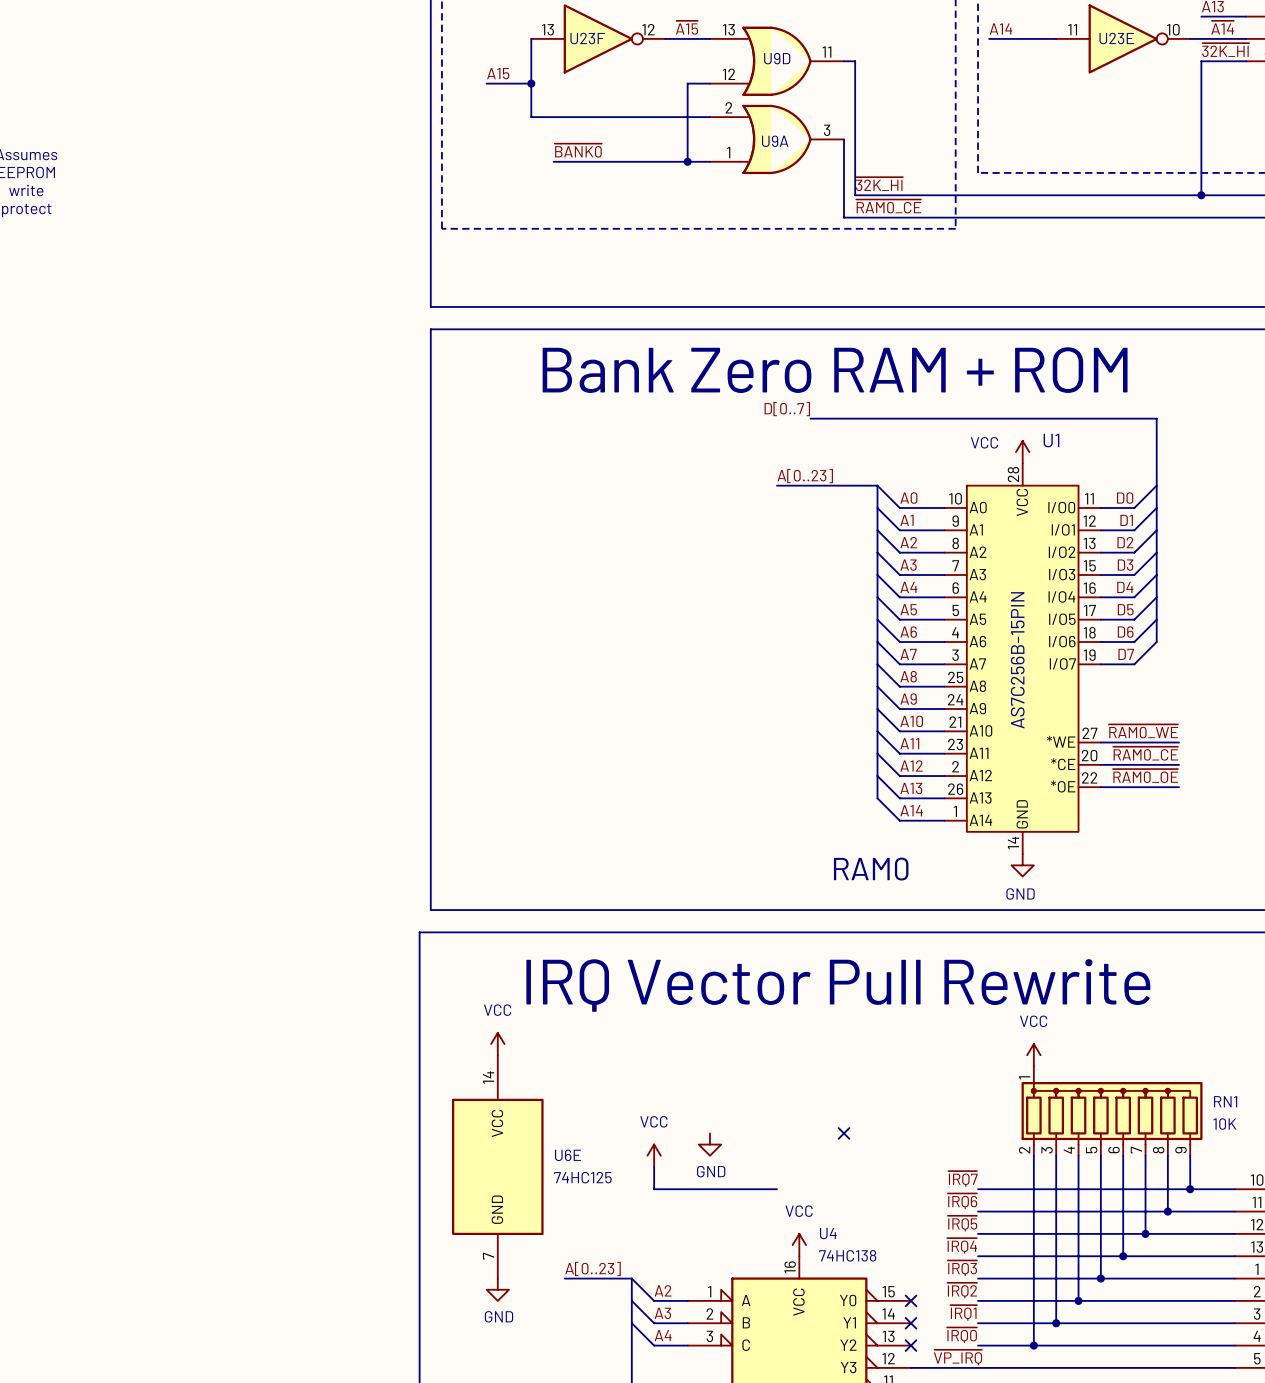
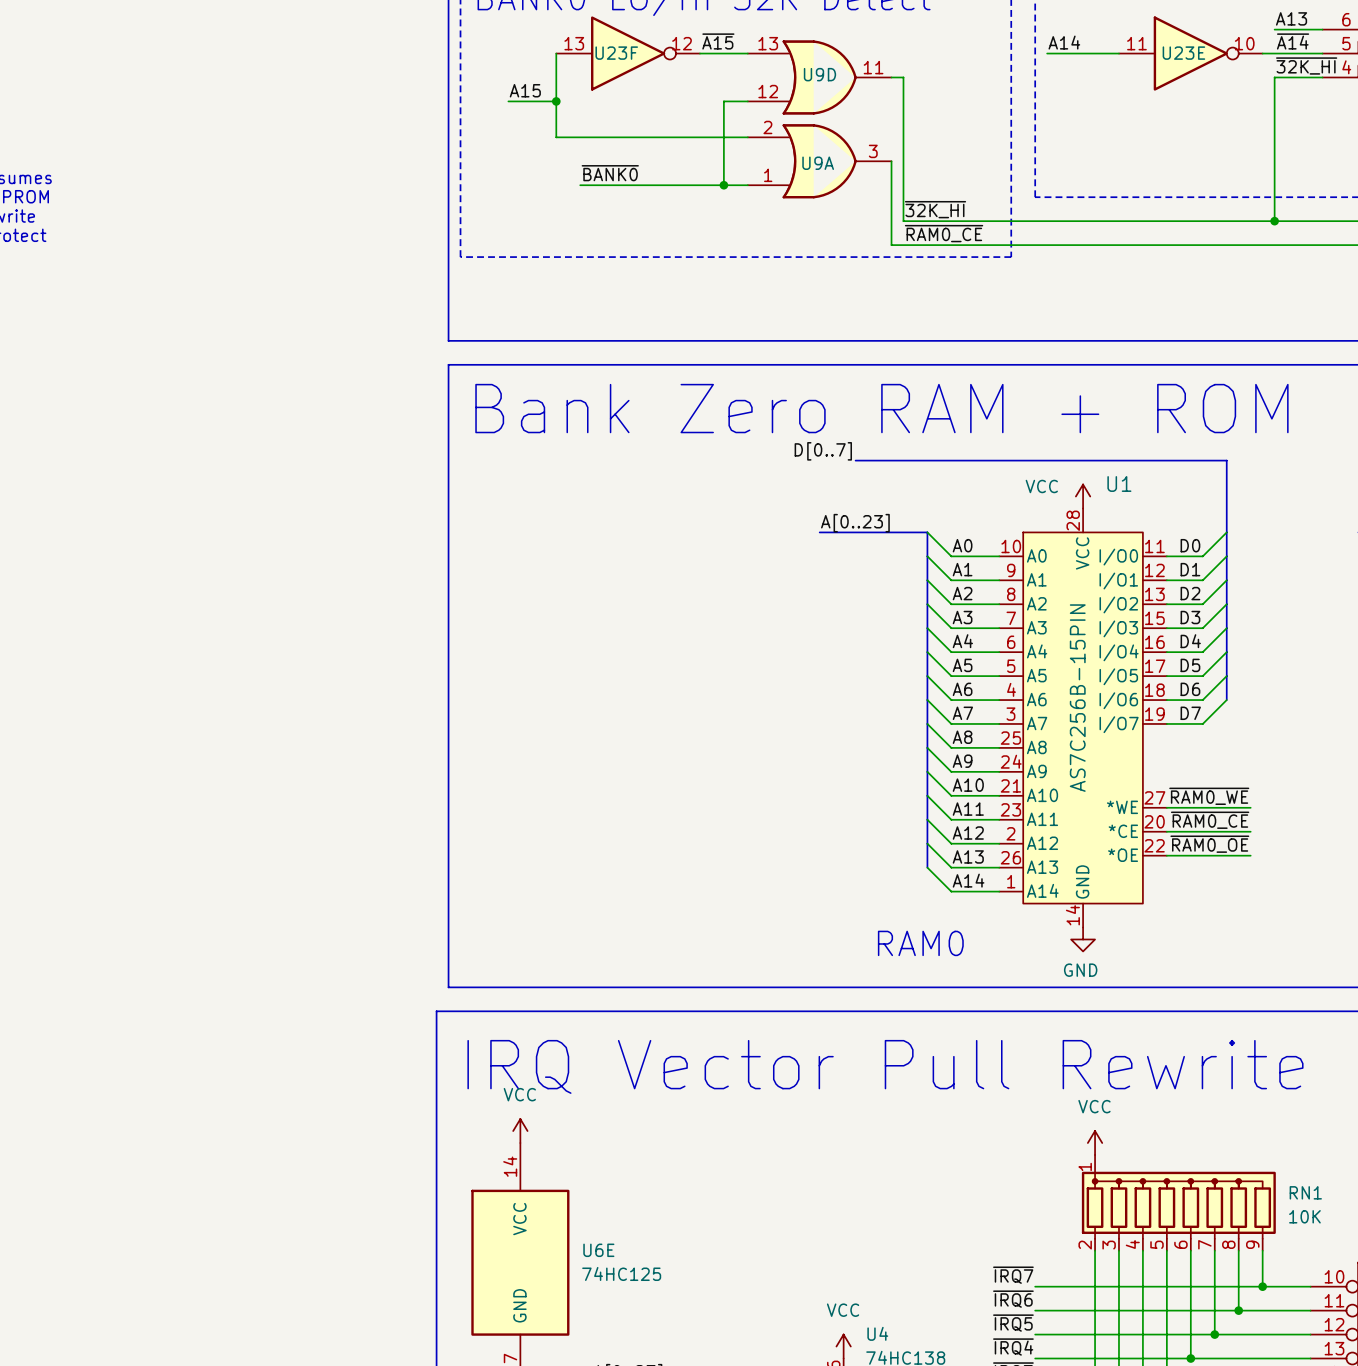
no-connect mark: (844, 1133) -> none
power symbol: GND (709, 1144) -> none
power symbol: VCC (654, 1155) -> none
wire: (654, 1166) (654, 1189) (776, 1189) -> none

